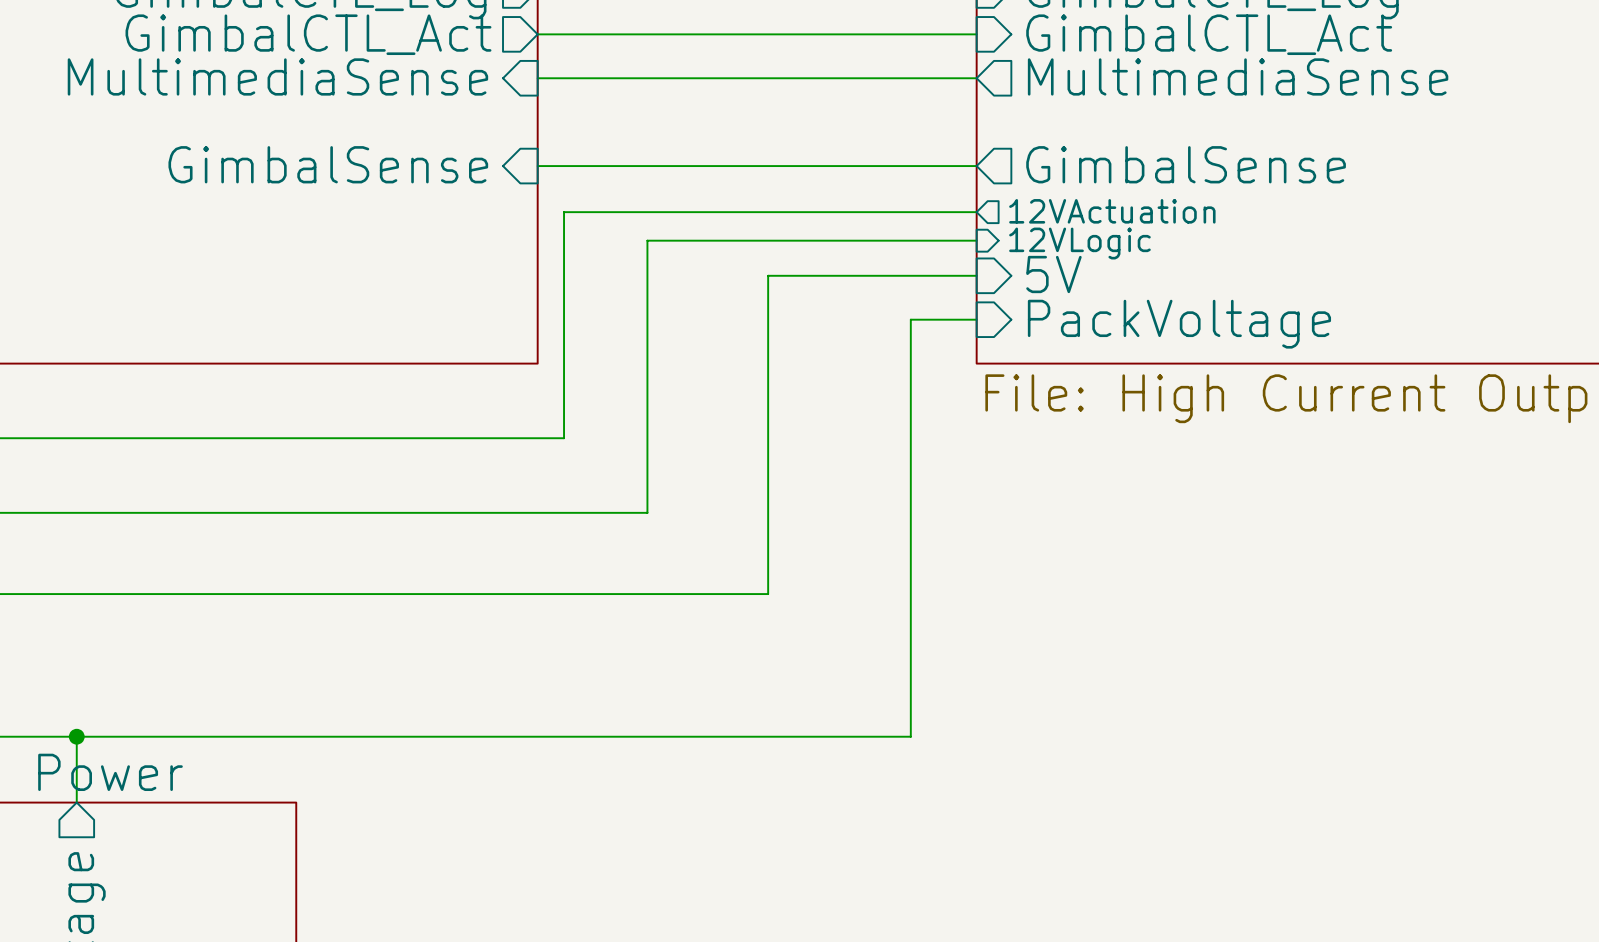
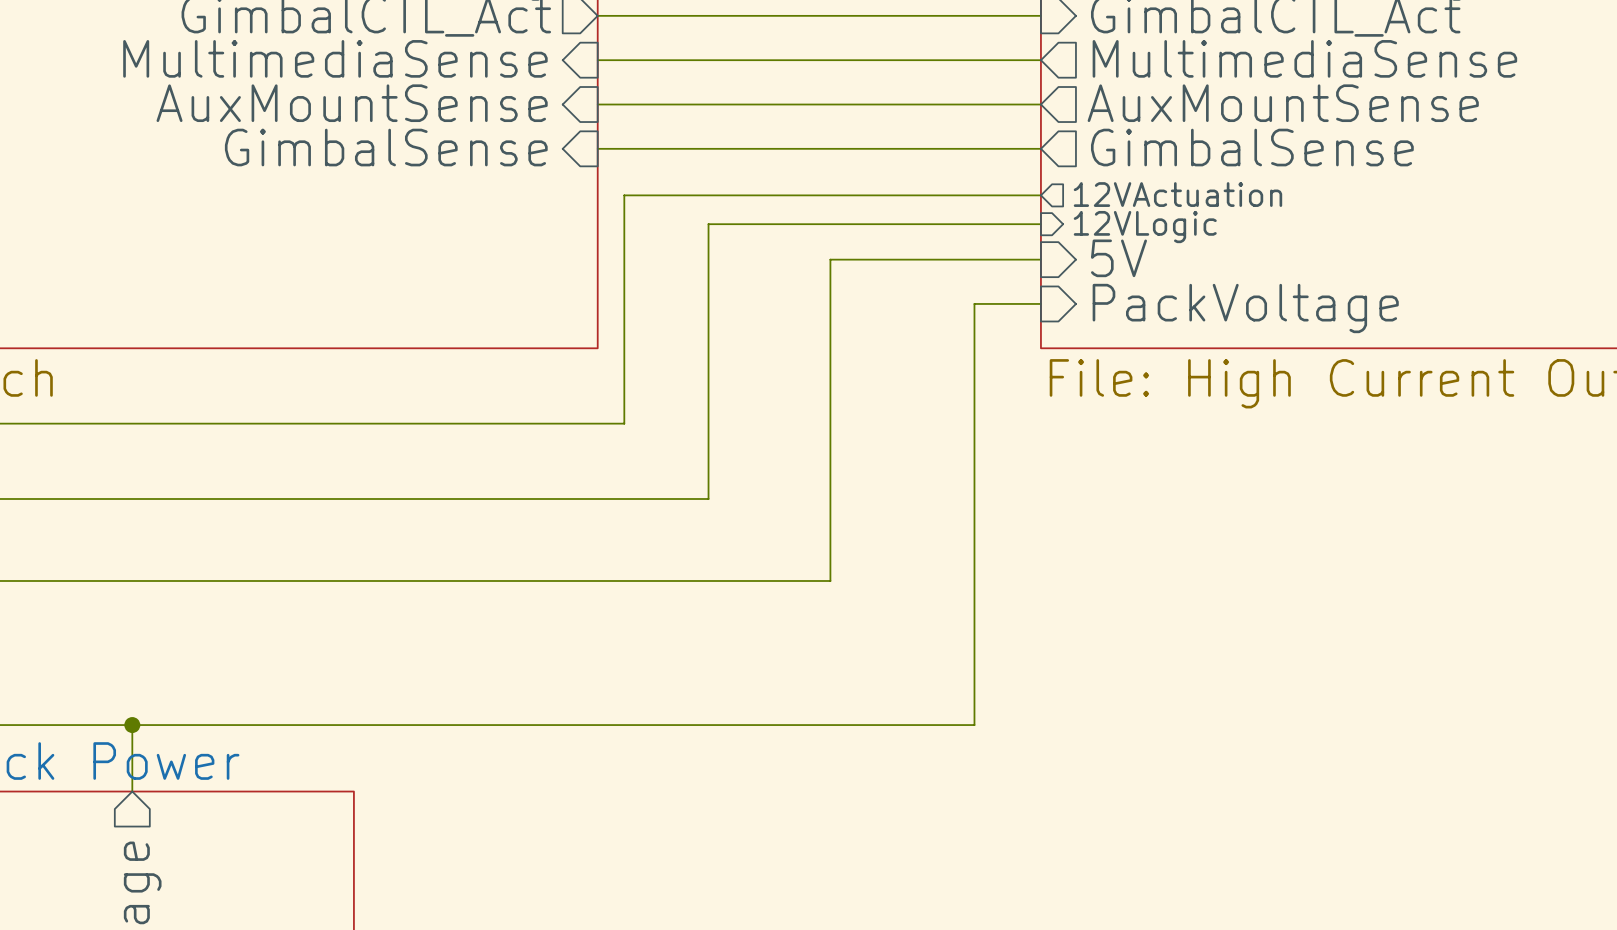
sheet pin: none -> AuxMountSense (352, 103)
sheet pin: none -> AuxMountSense (1283, 103)
wire: none -> (597, 104) (1040, 104)

